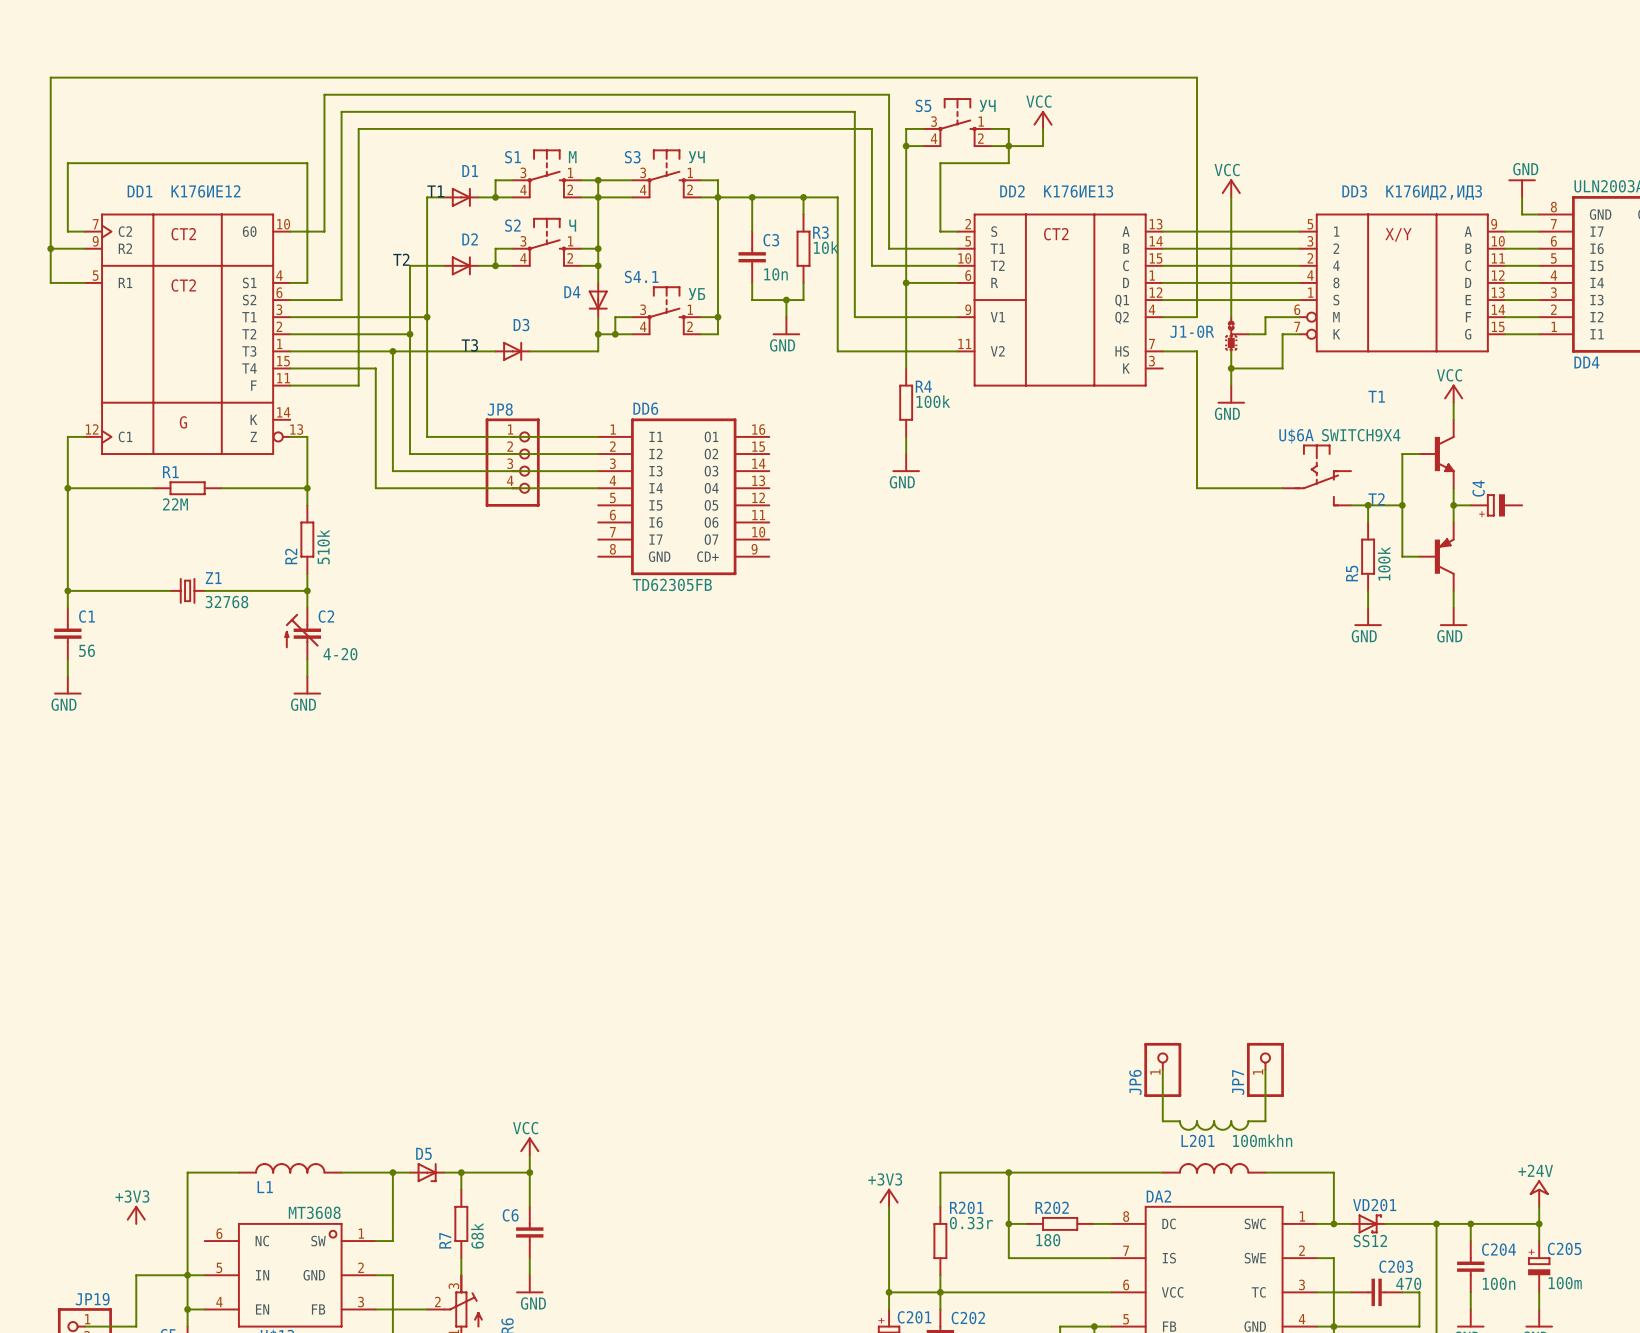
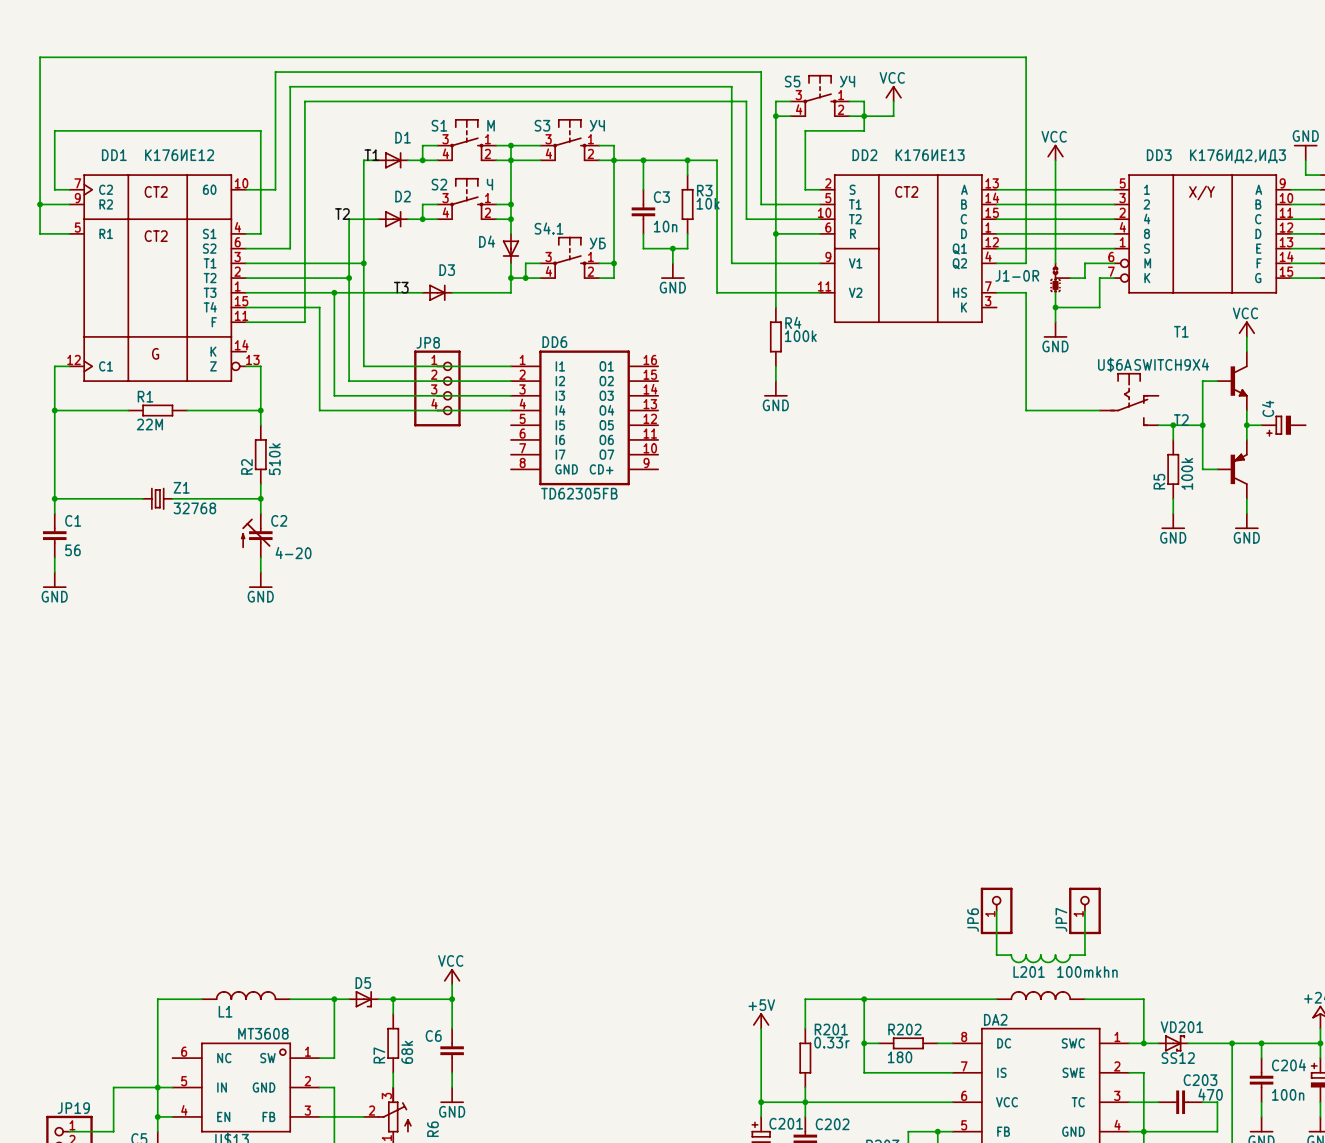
power symbol: +3V3 (889, 1197) -> +5V (761, 1020)
power symbol: +3V3 (136, 1214) -> none

